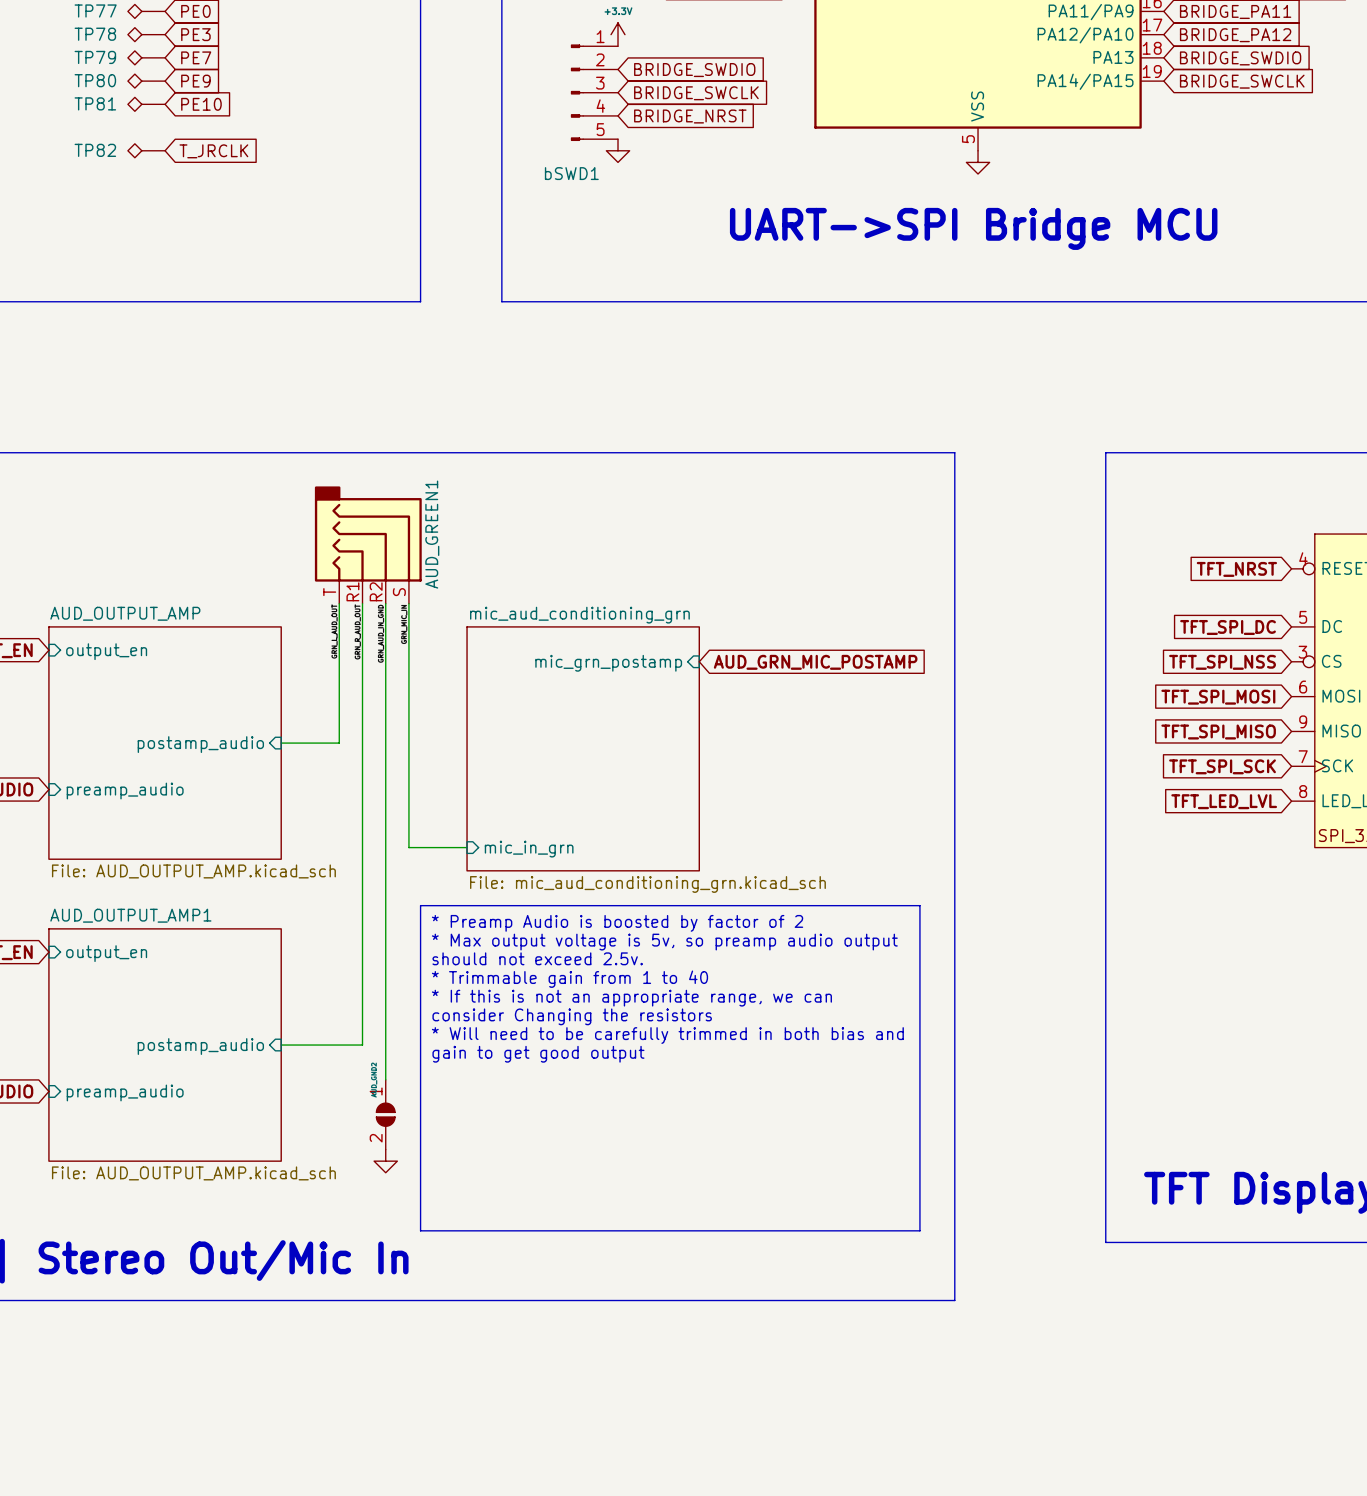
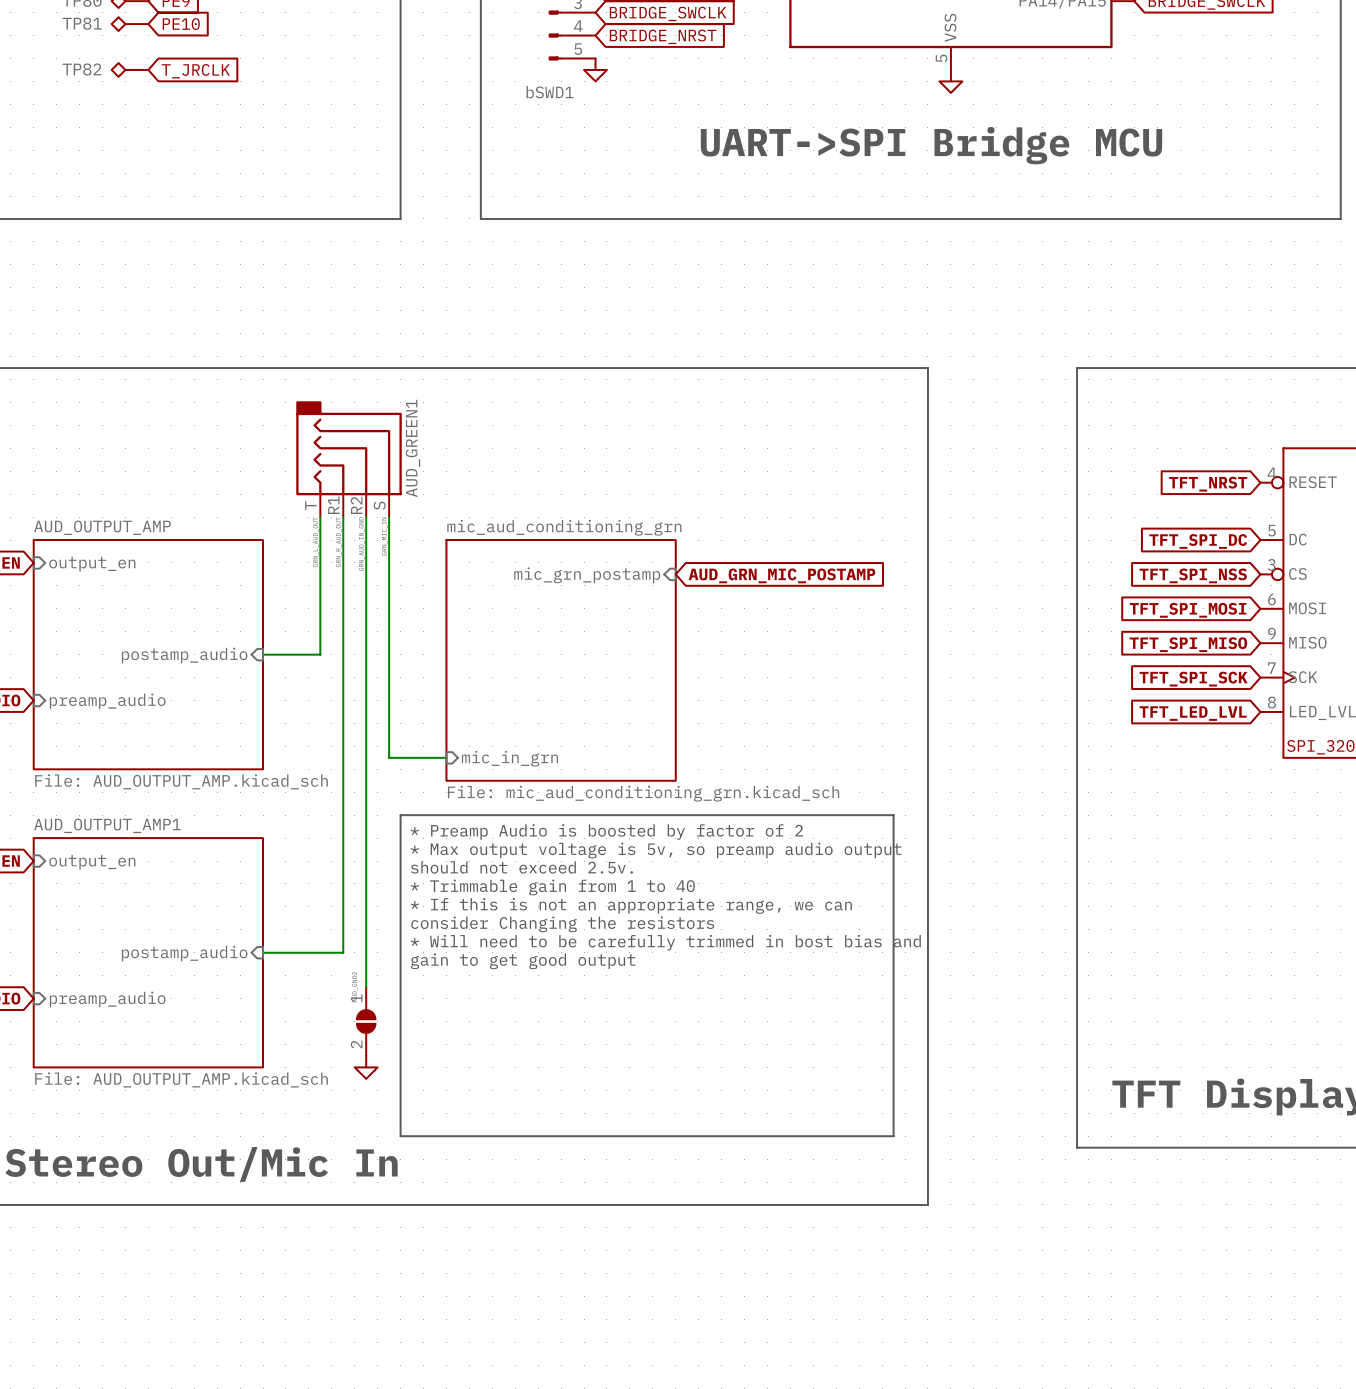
text: * Will need to be carefully trimmed in both bias and (667, 1035) -> * Will need to be carefully trimmed in bost bias and (665, 942)

